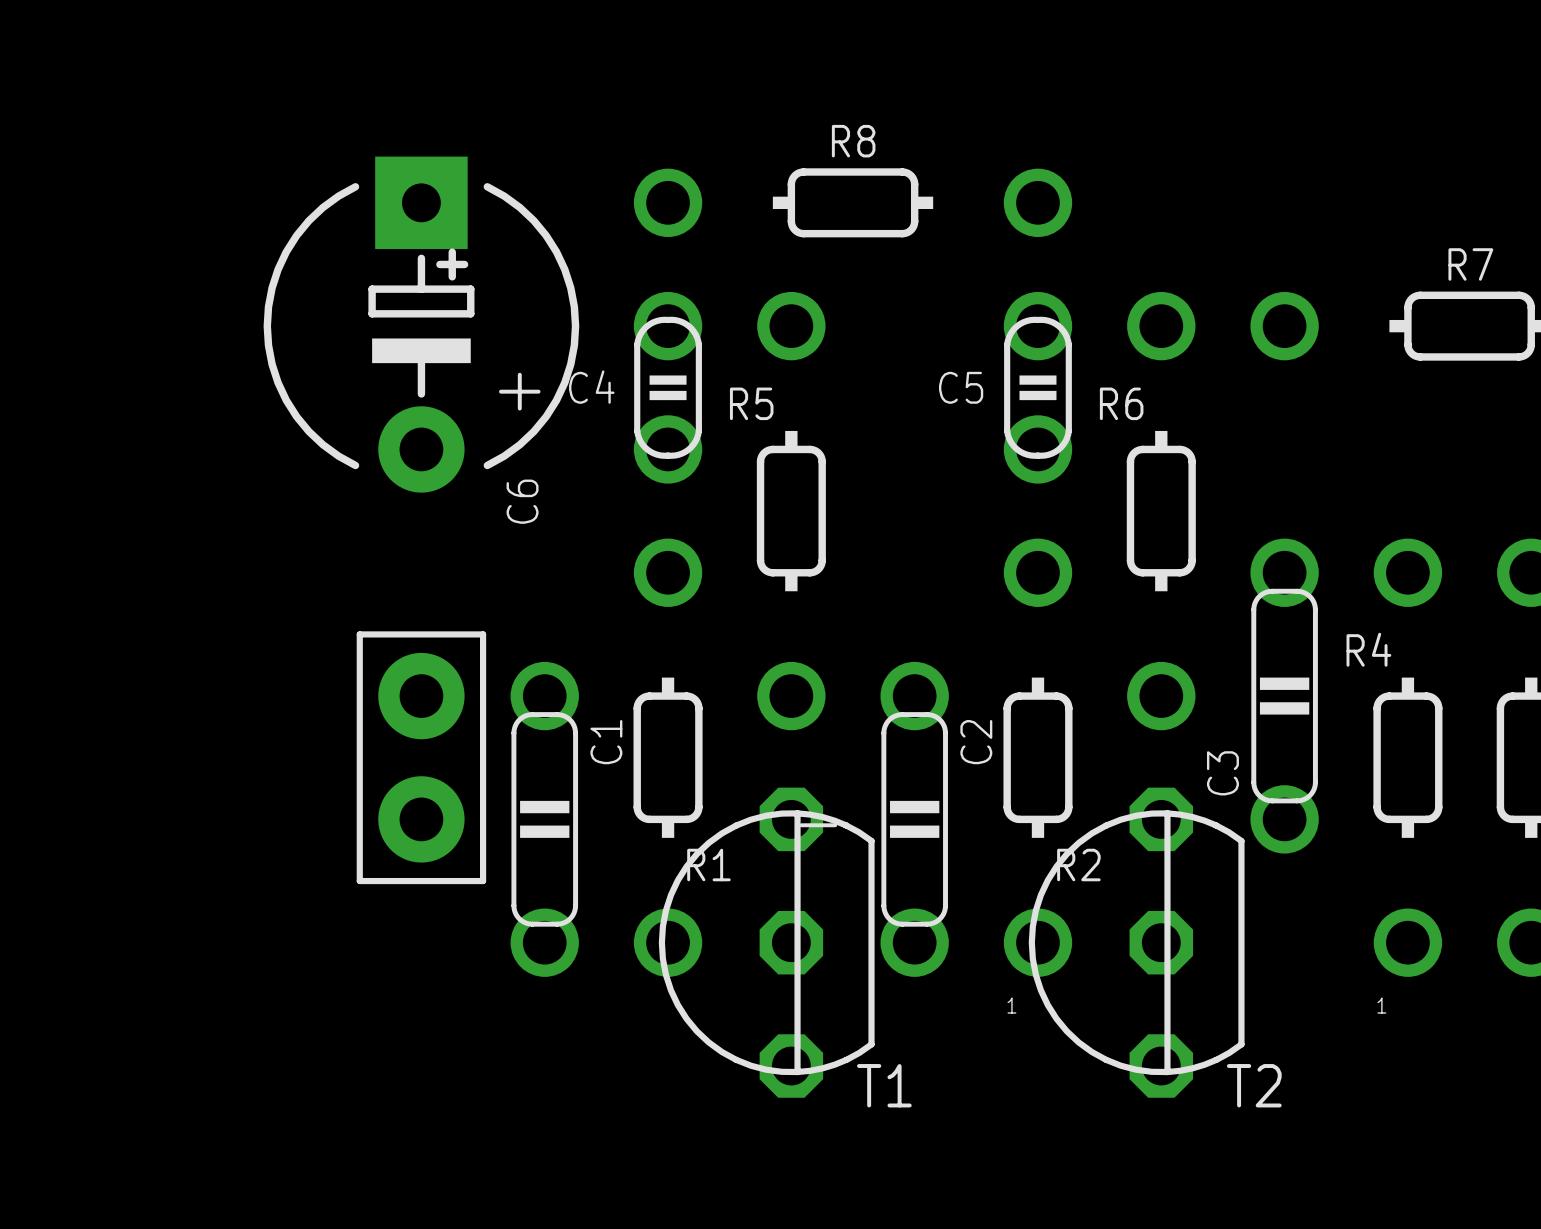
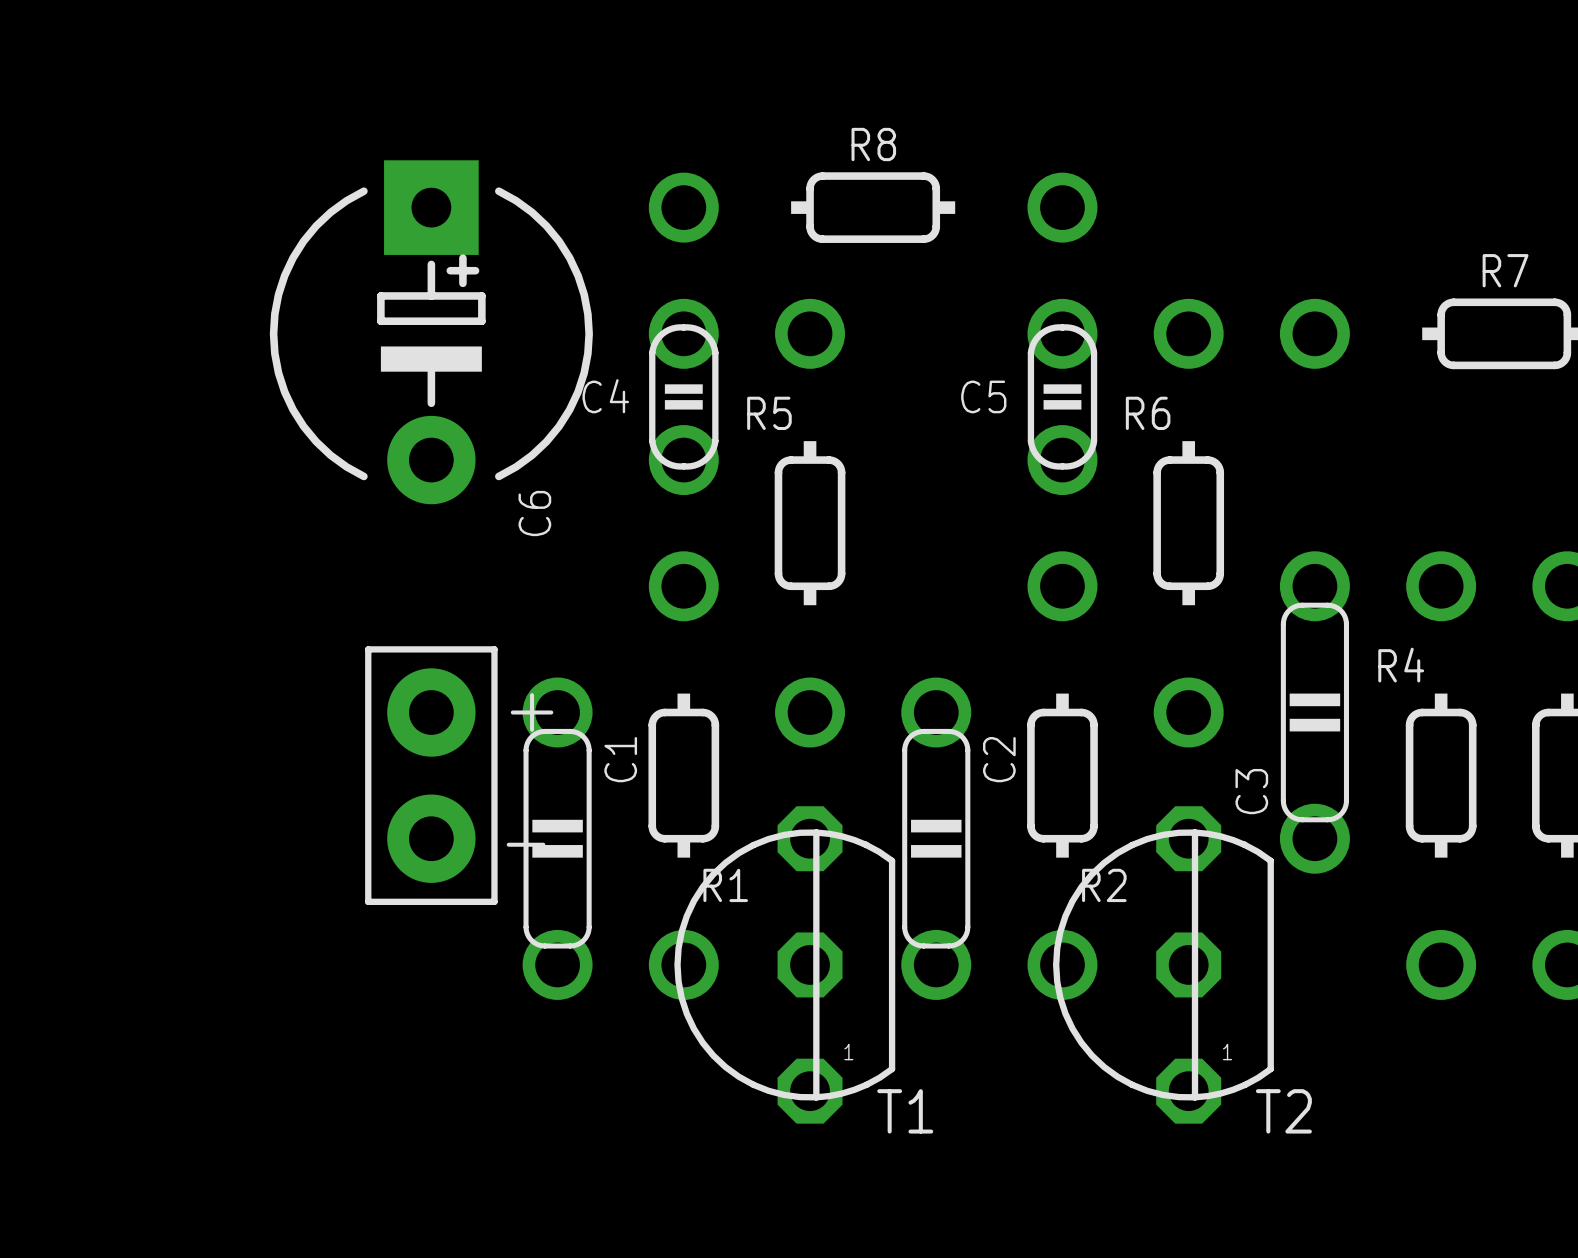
part footprint: [356, 631, 487, 885] -> [365, 646, 498, 905]
T1 text: 1 (1011, 1005) -> none
T2 text: 1 (1381, 1005) -> none
T1 text: none -> 1 (848, 1052)
T2 text: none -> 1 (1227, 1052)

